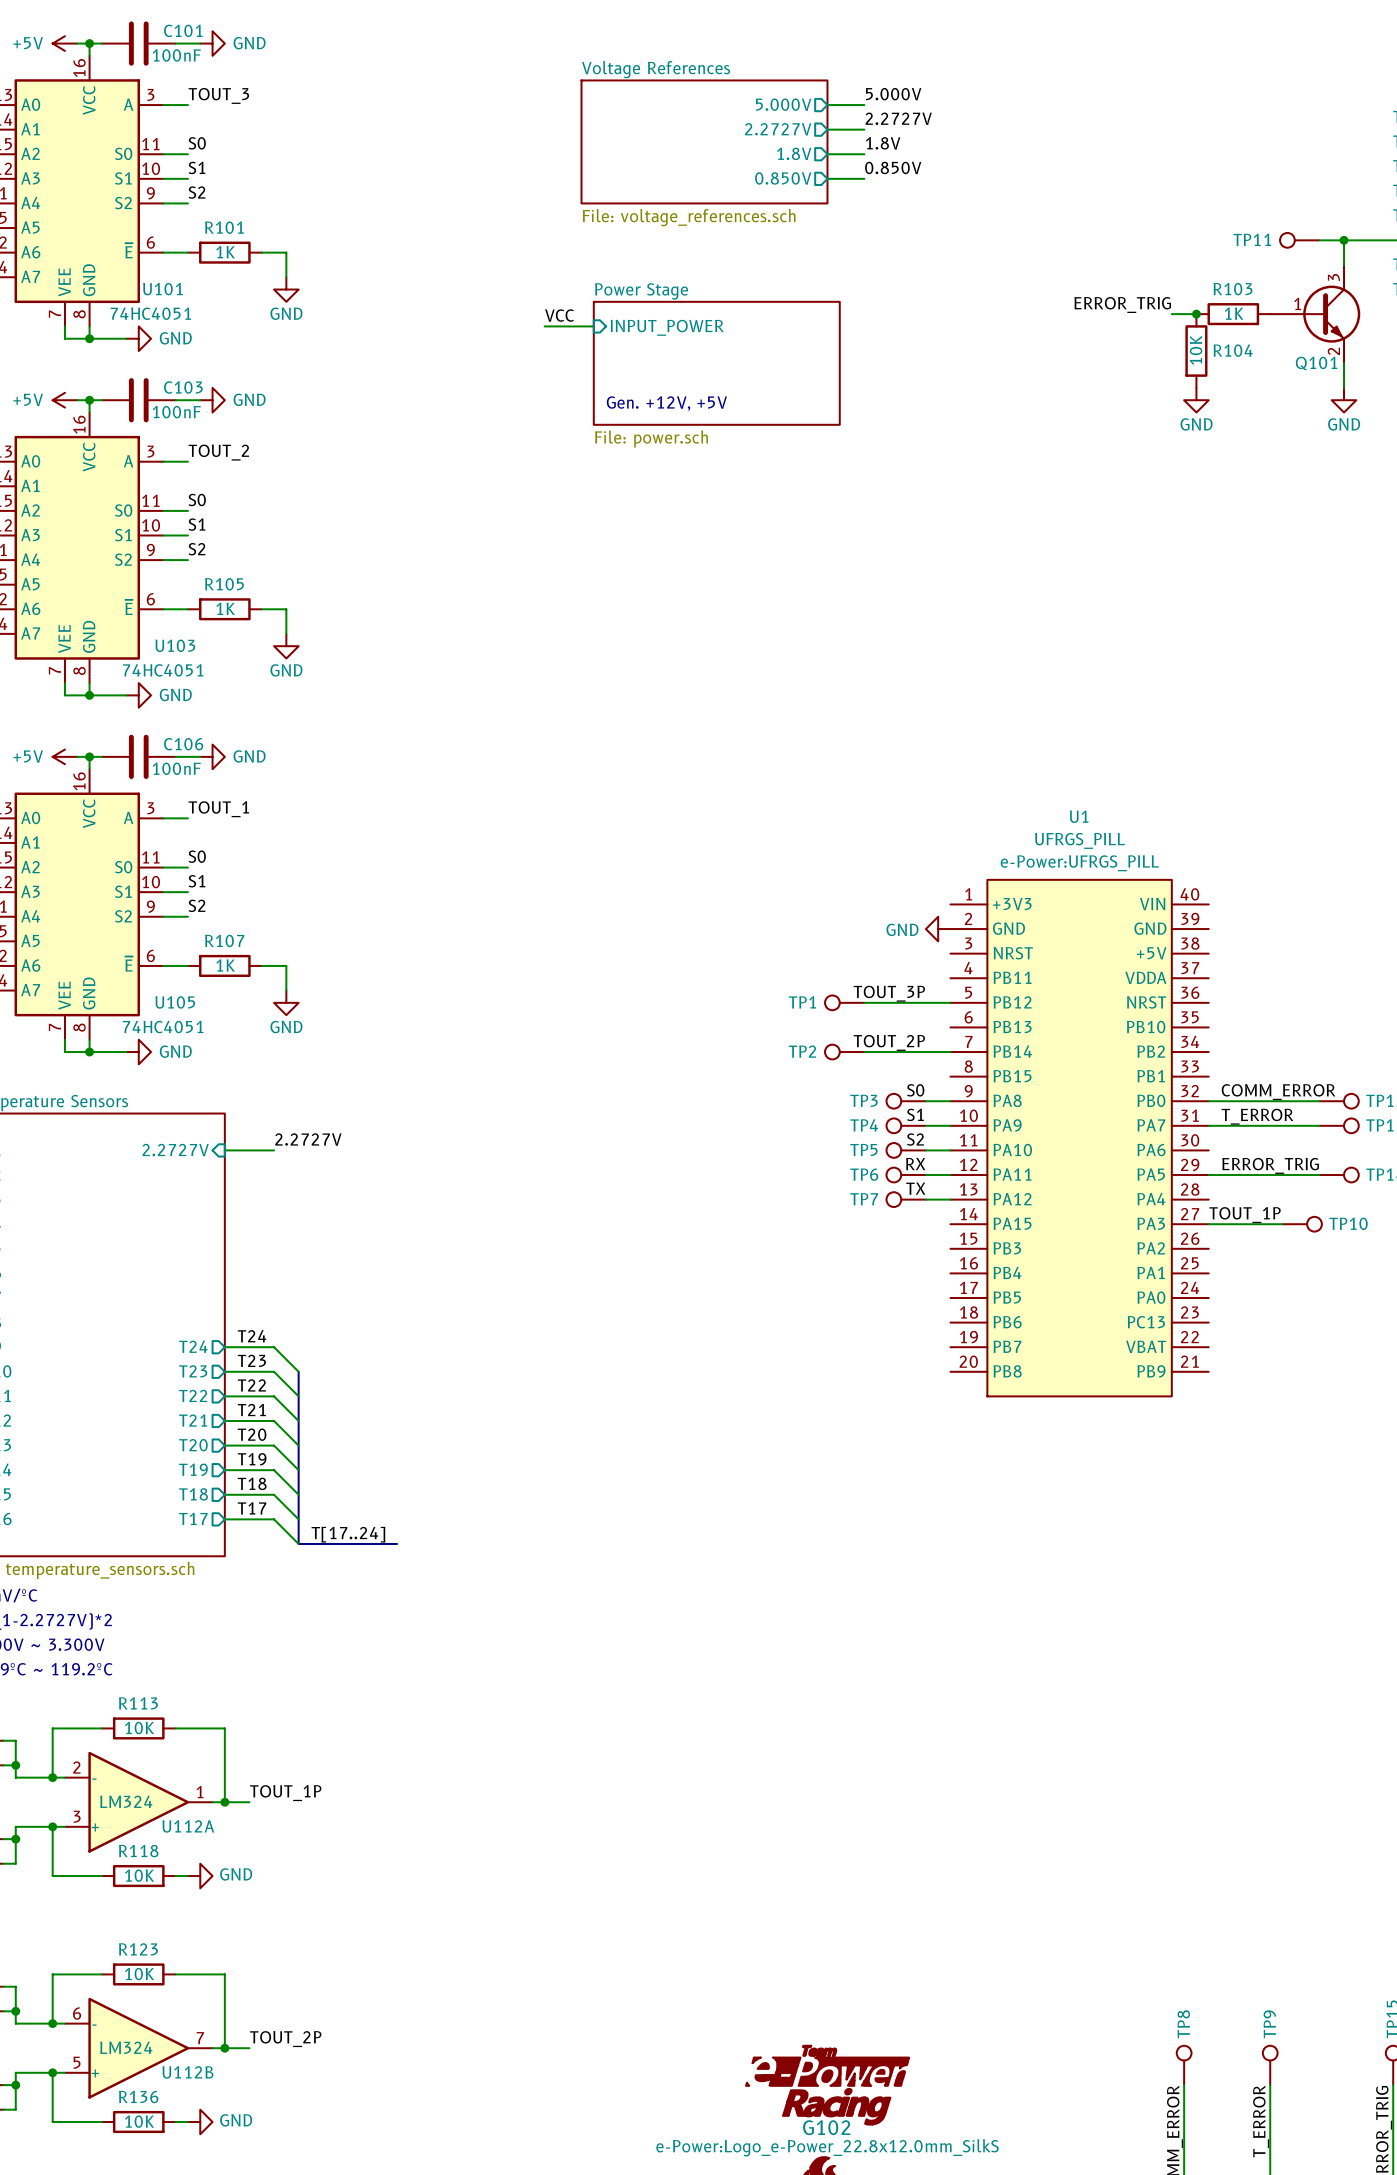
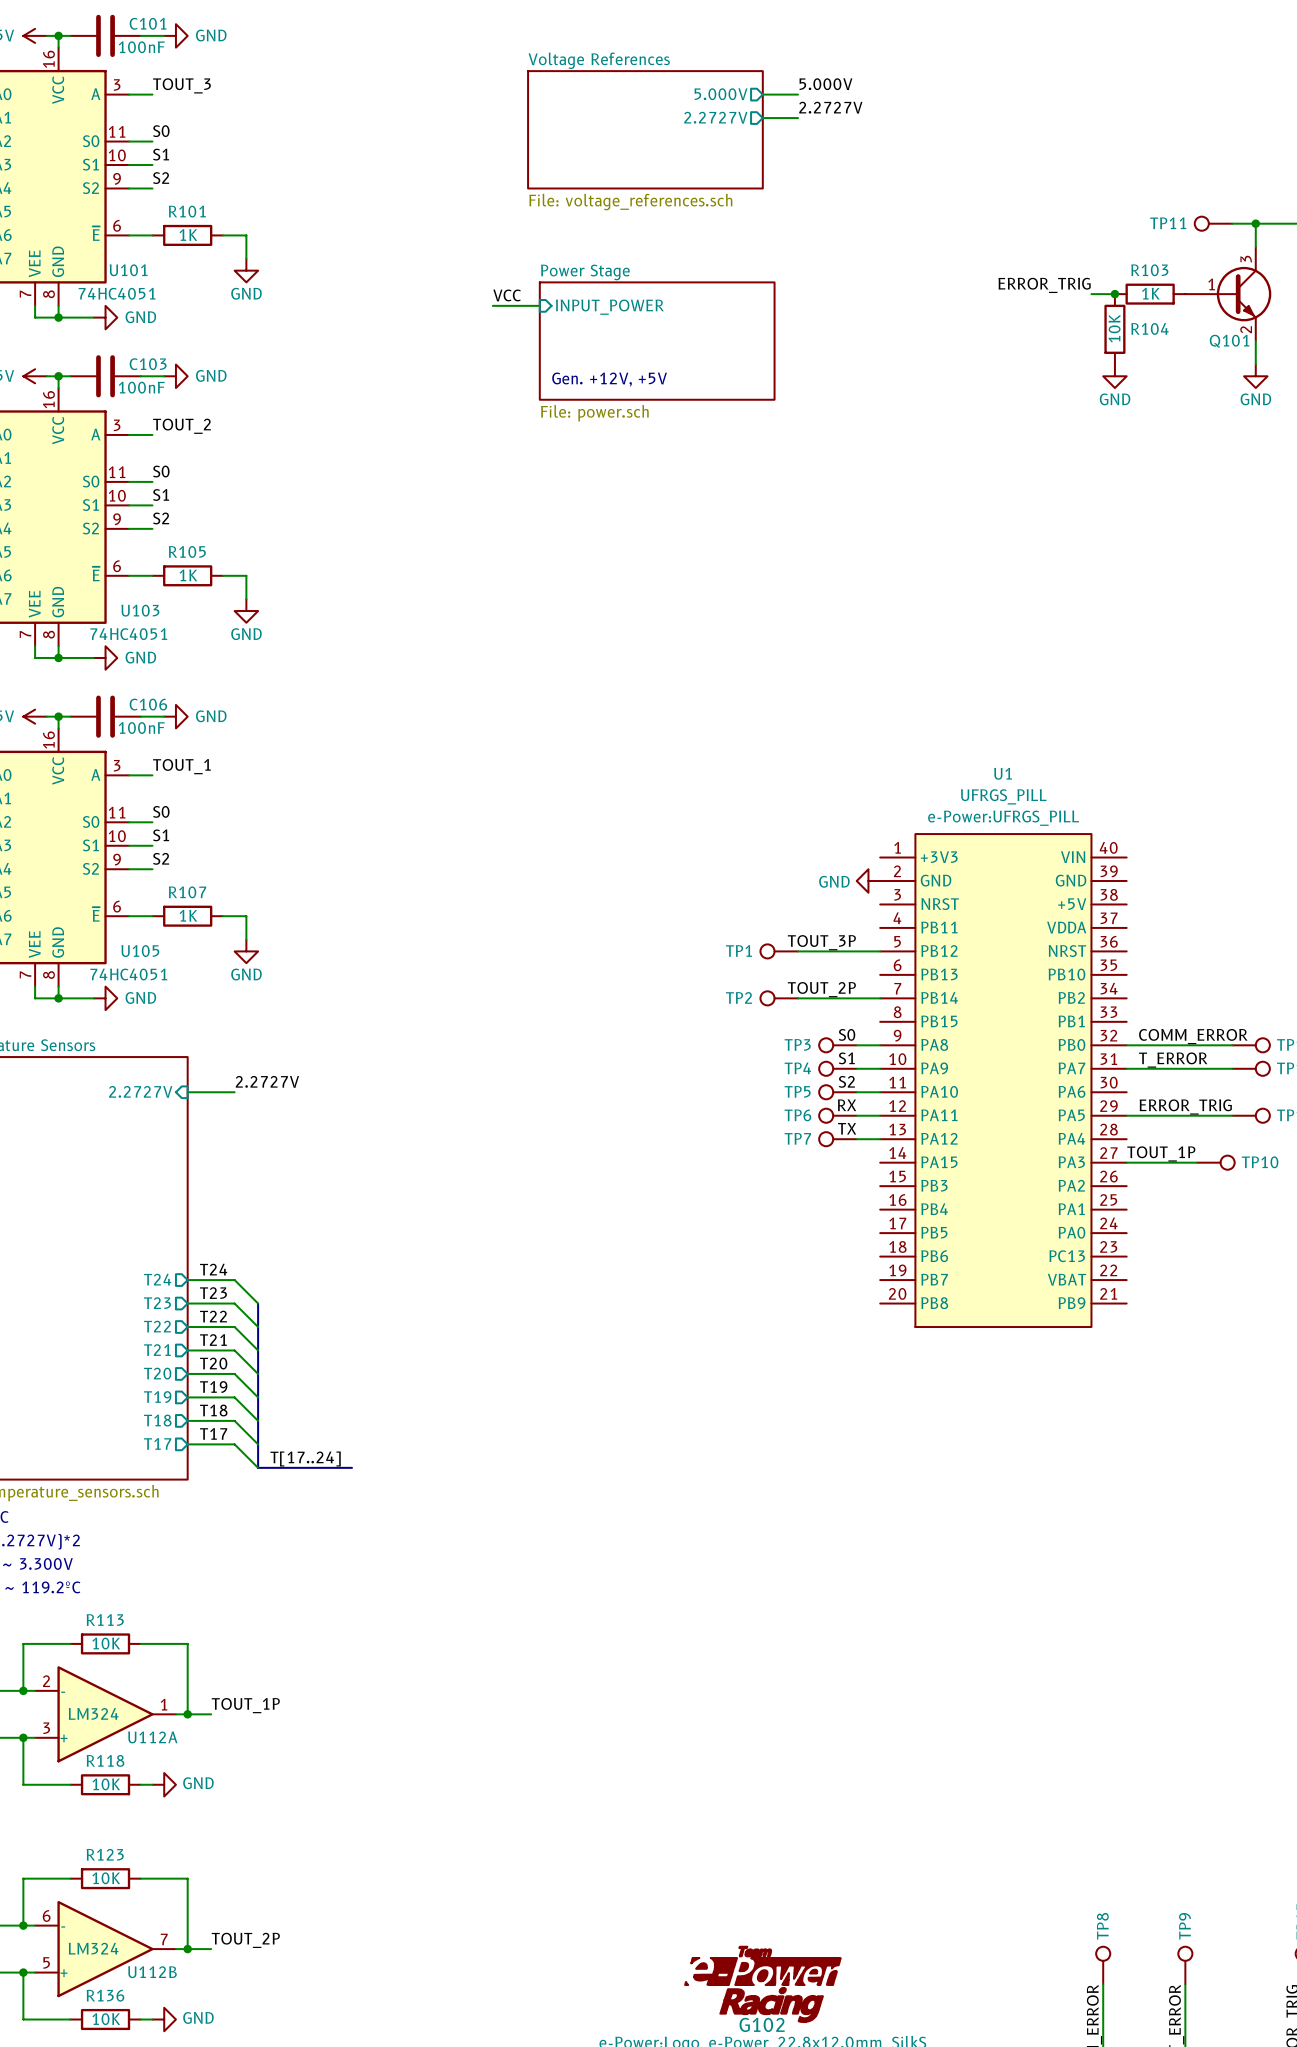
label: 1.8V (883, 143) -> none
sheet pin: 1.8V (794, 153) -> none
wire: (827, 154) (864, 154) -> none
label: 0.850V (893, 167) -> none
sheet pin: 0.850V (783, 178) -> none
wire: (827, 178) (864, 178) -> none

